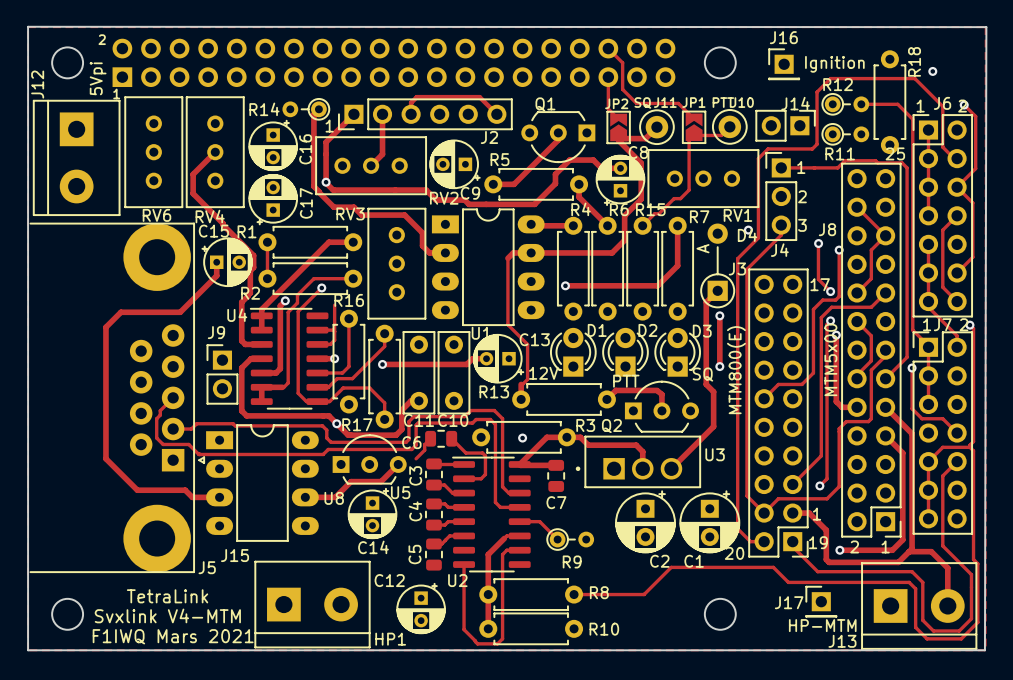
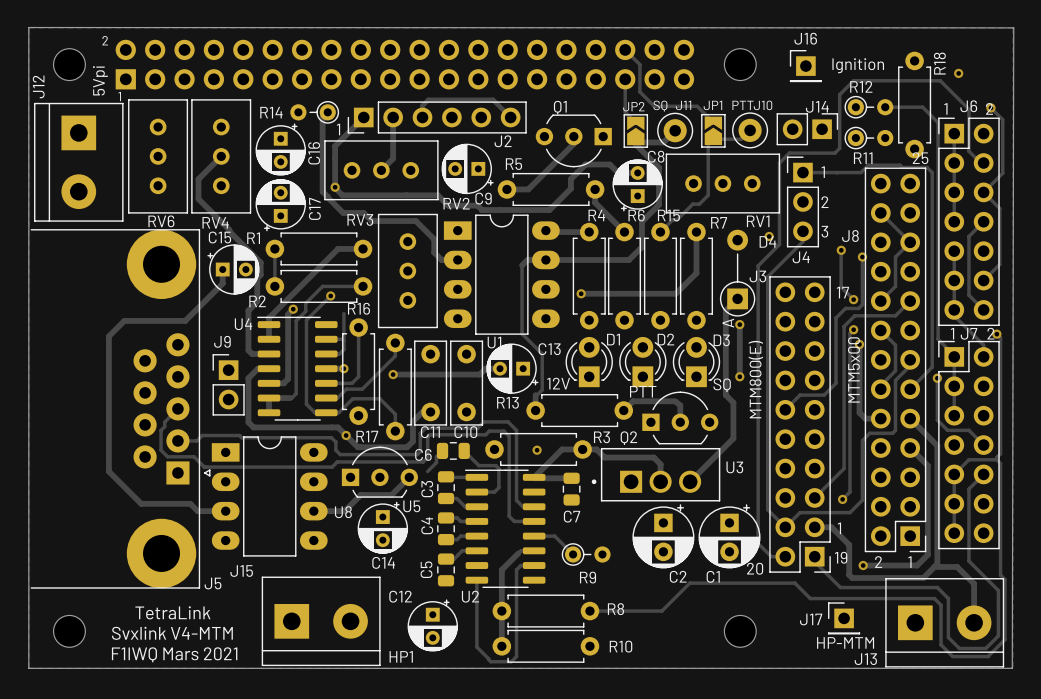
D4 text position: A (702, 248) -> A (728, 323)

